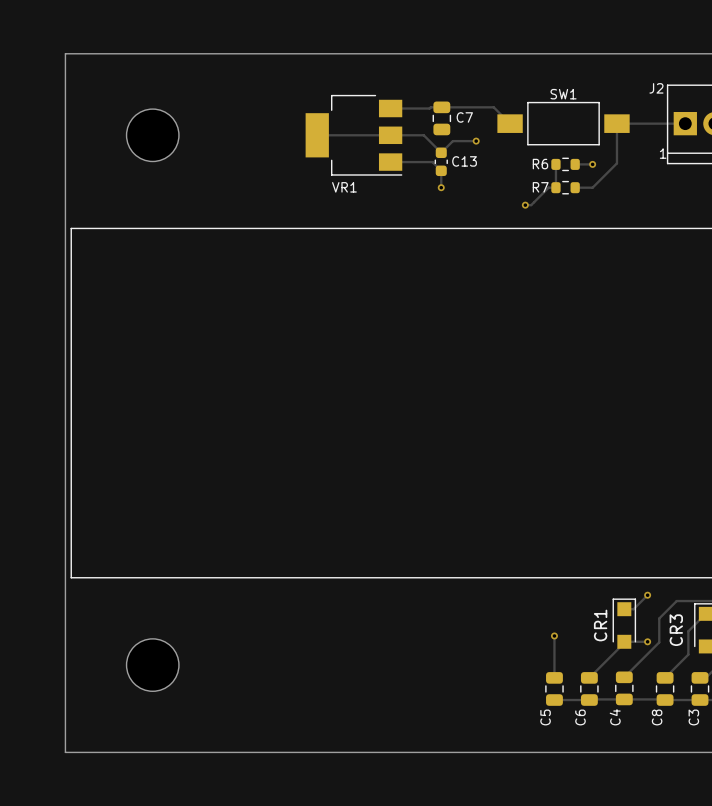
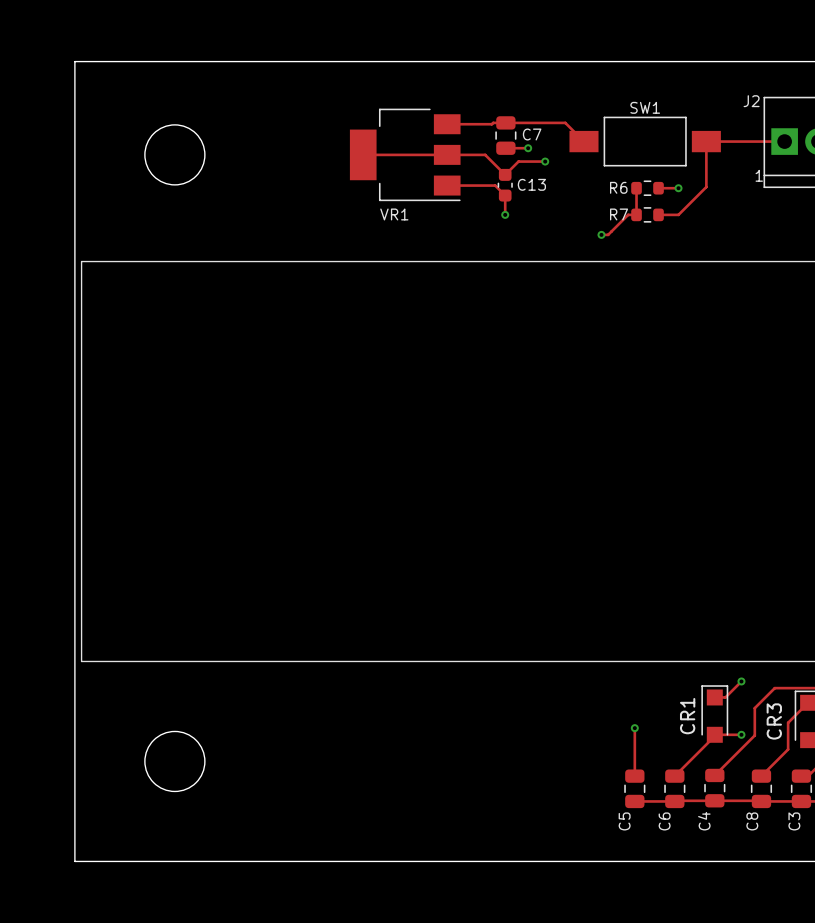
track: none -> (505, 148) (528, 148)
via: none -> (528, 148)

